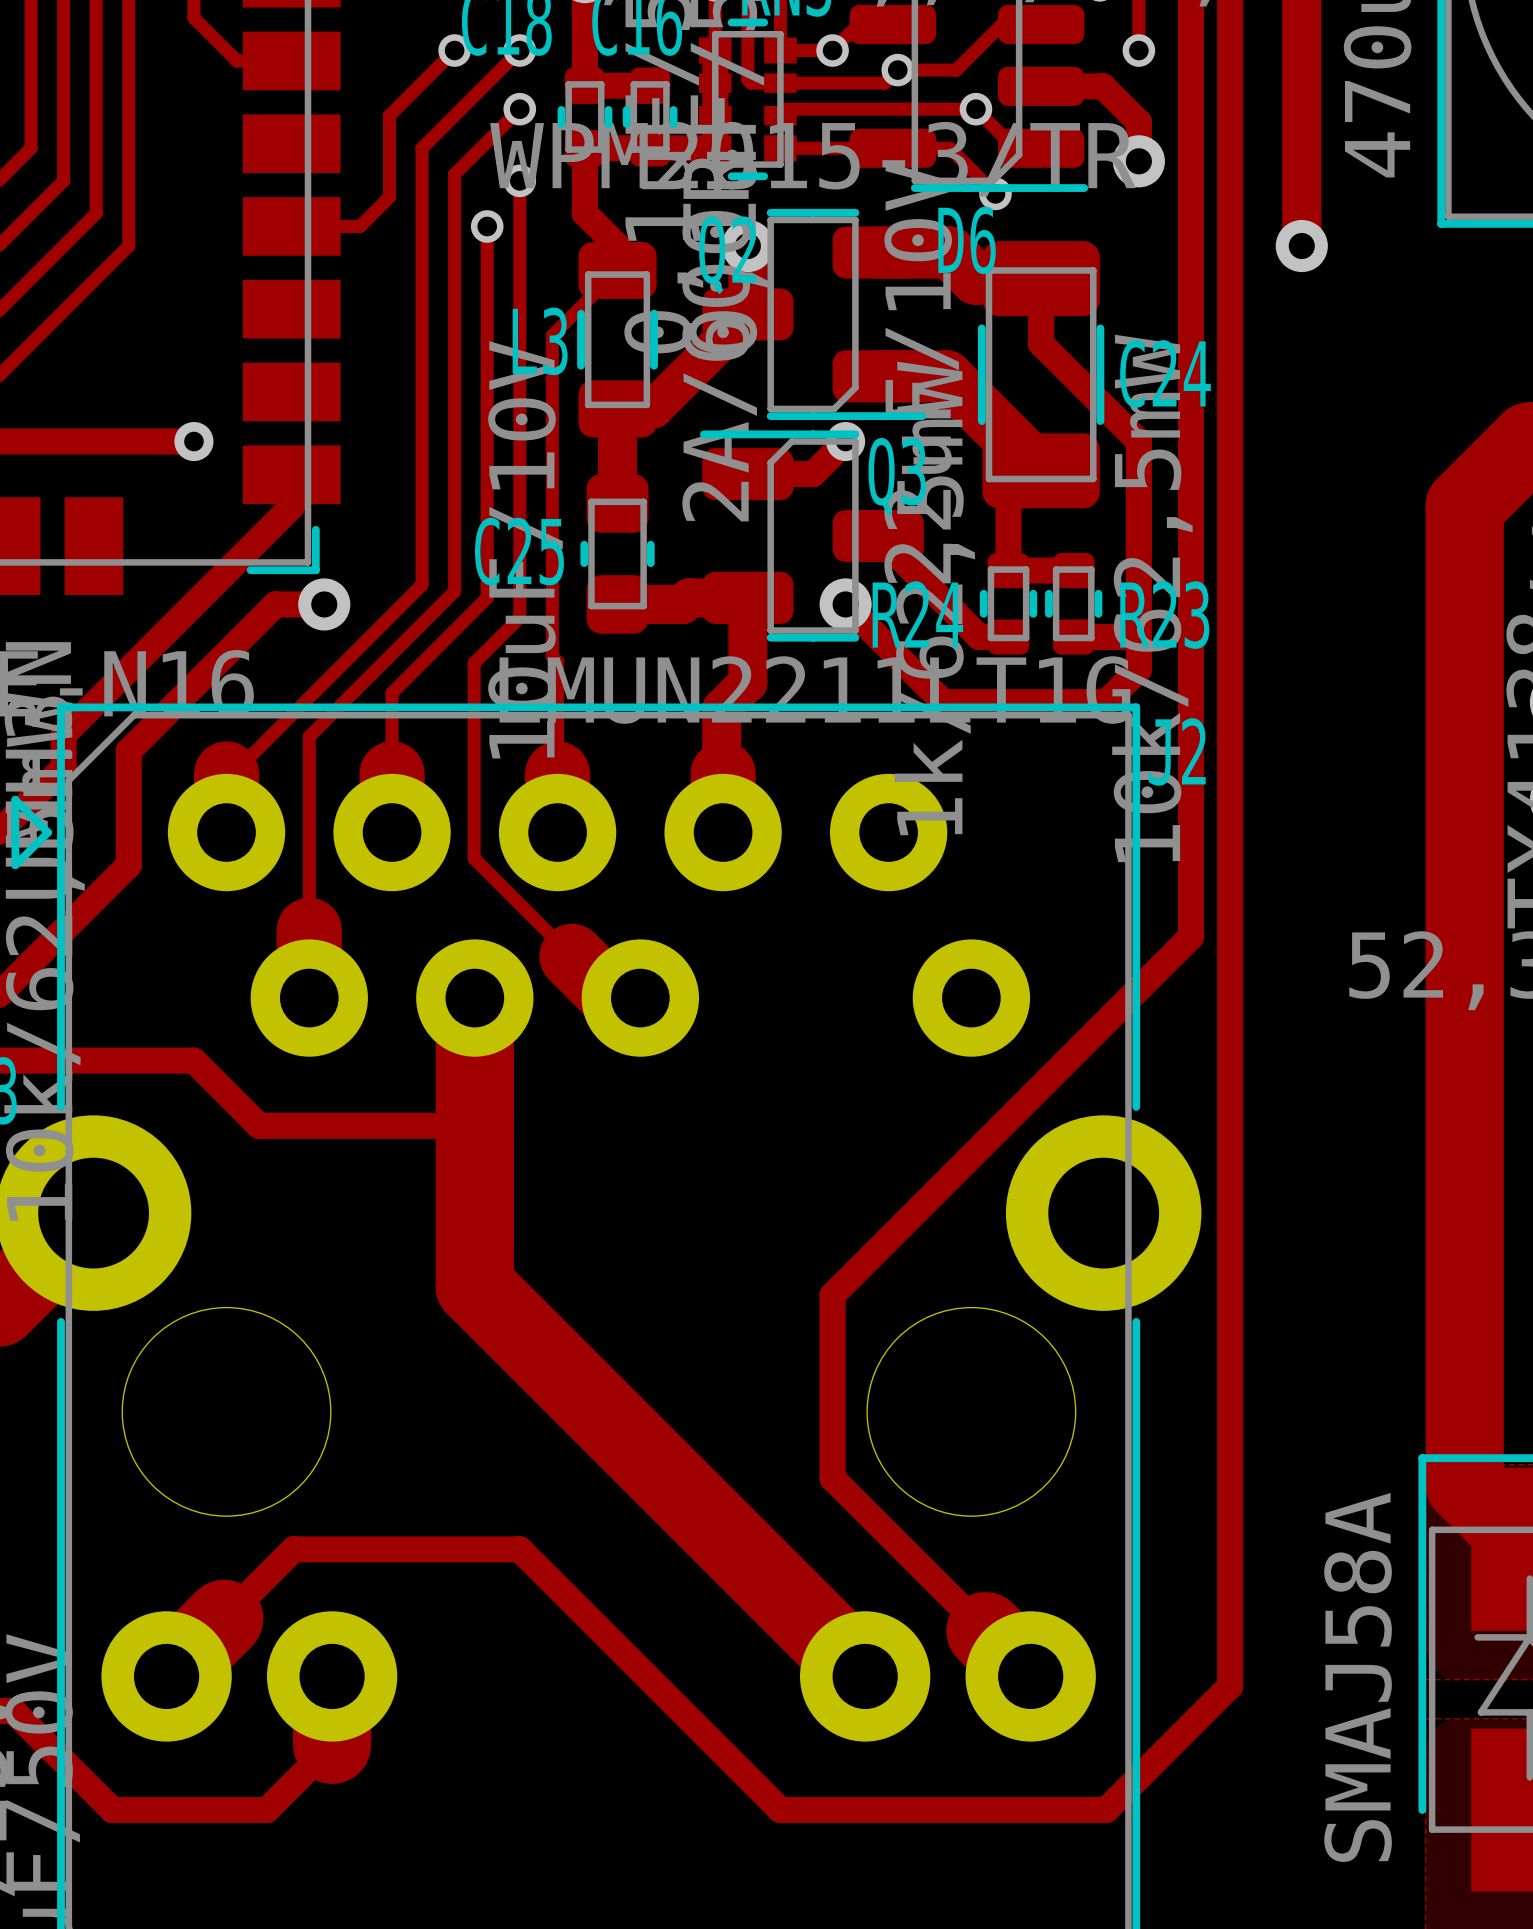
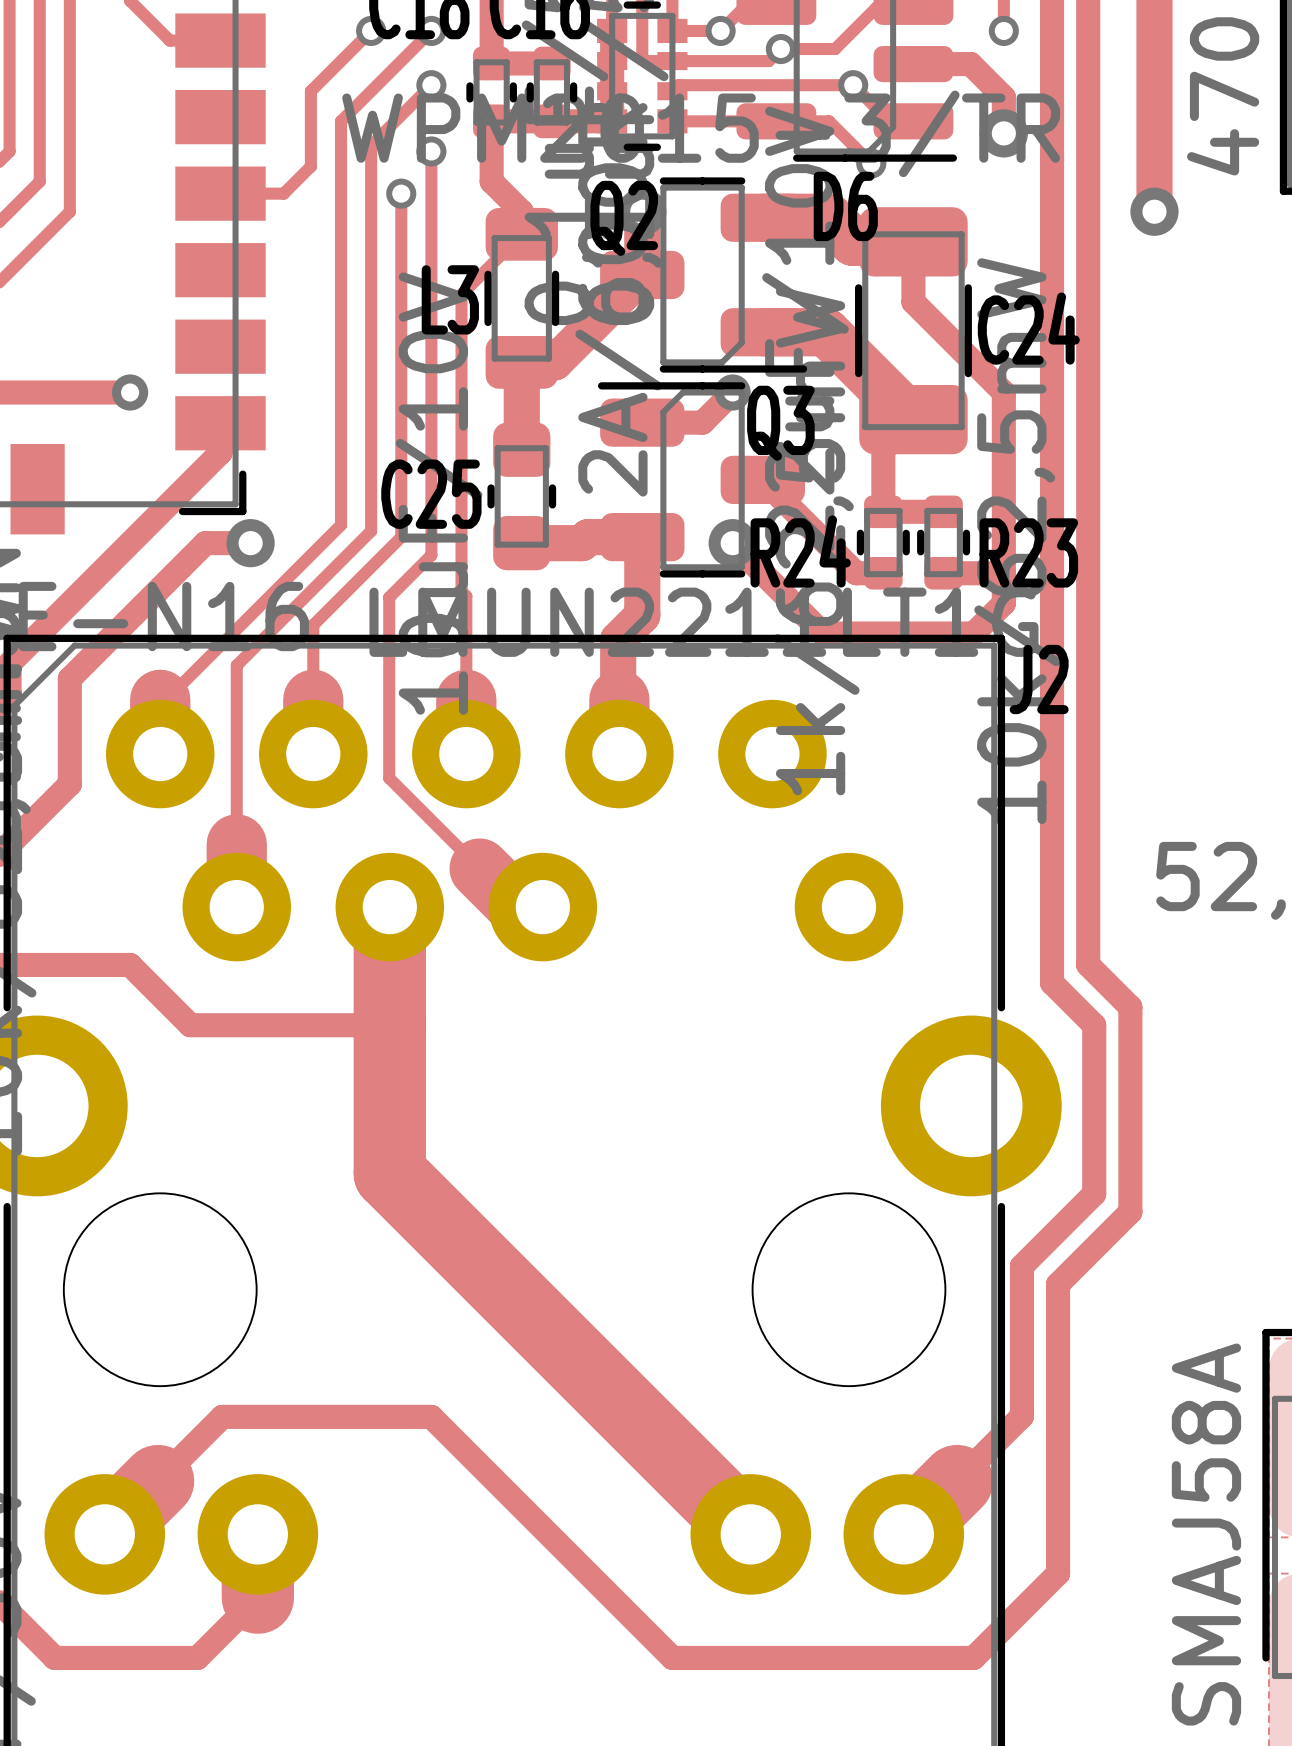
track: (1191, 936) (832, 1295) (832, 1478) (1030, 1676) -> (1052, 850) (1052, 983) (1094, 1025) (1094, 1193) (1021, 1266) (1021, 1416) (903, 1534)
track: (1230, 1060) (1230, 1686) (1197, 1718) -> (1088, 964) (1130, 1007) (1130, 1212) (1058, 1284) (1058, 1573)

